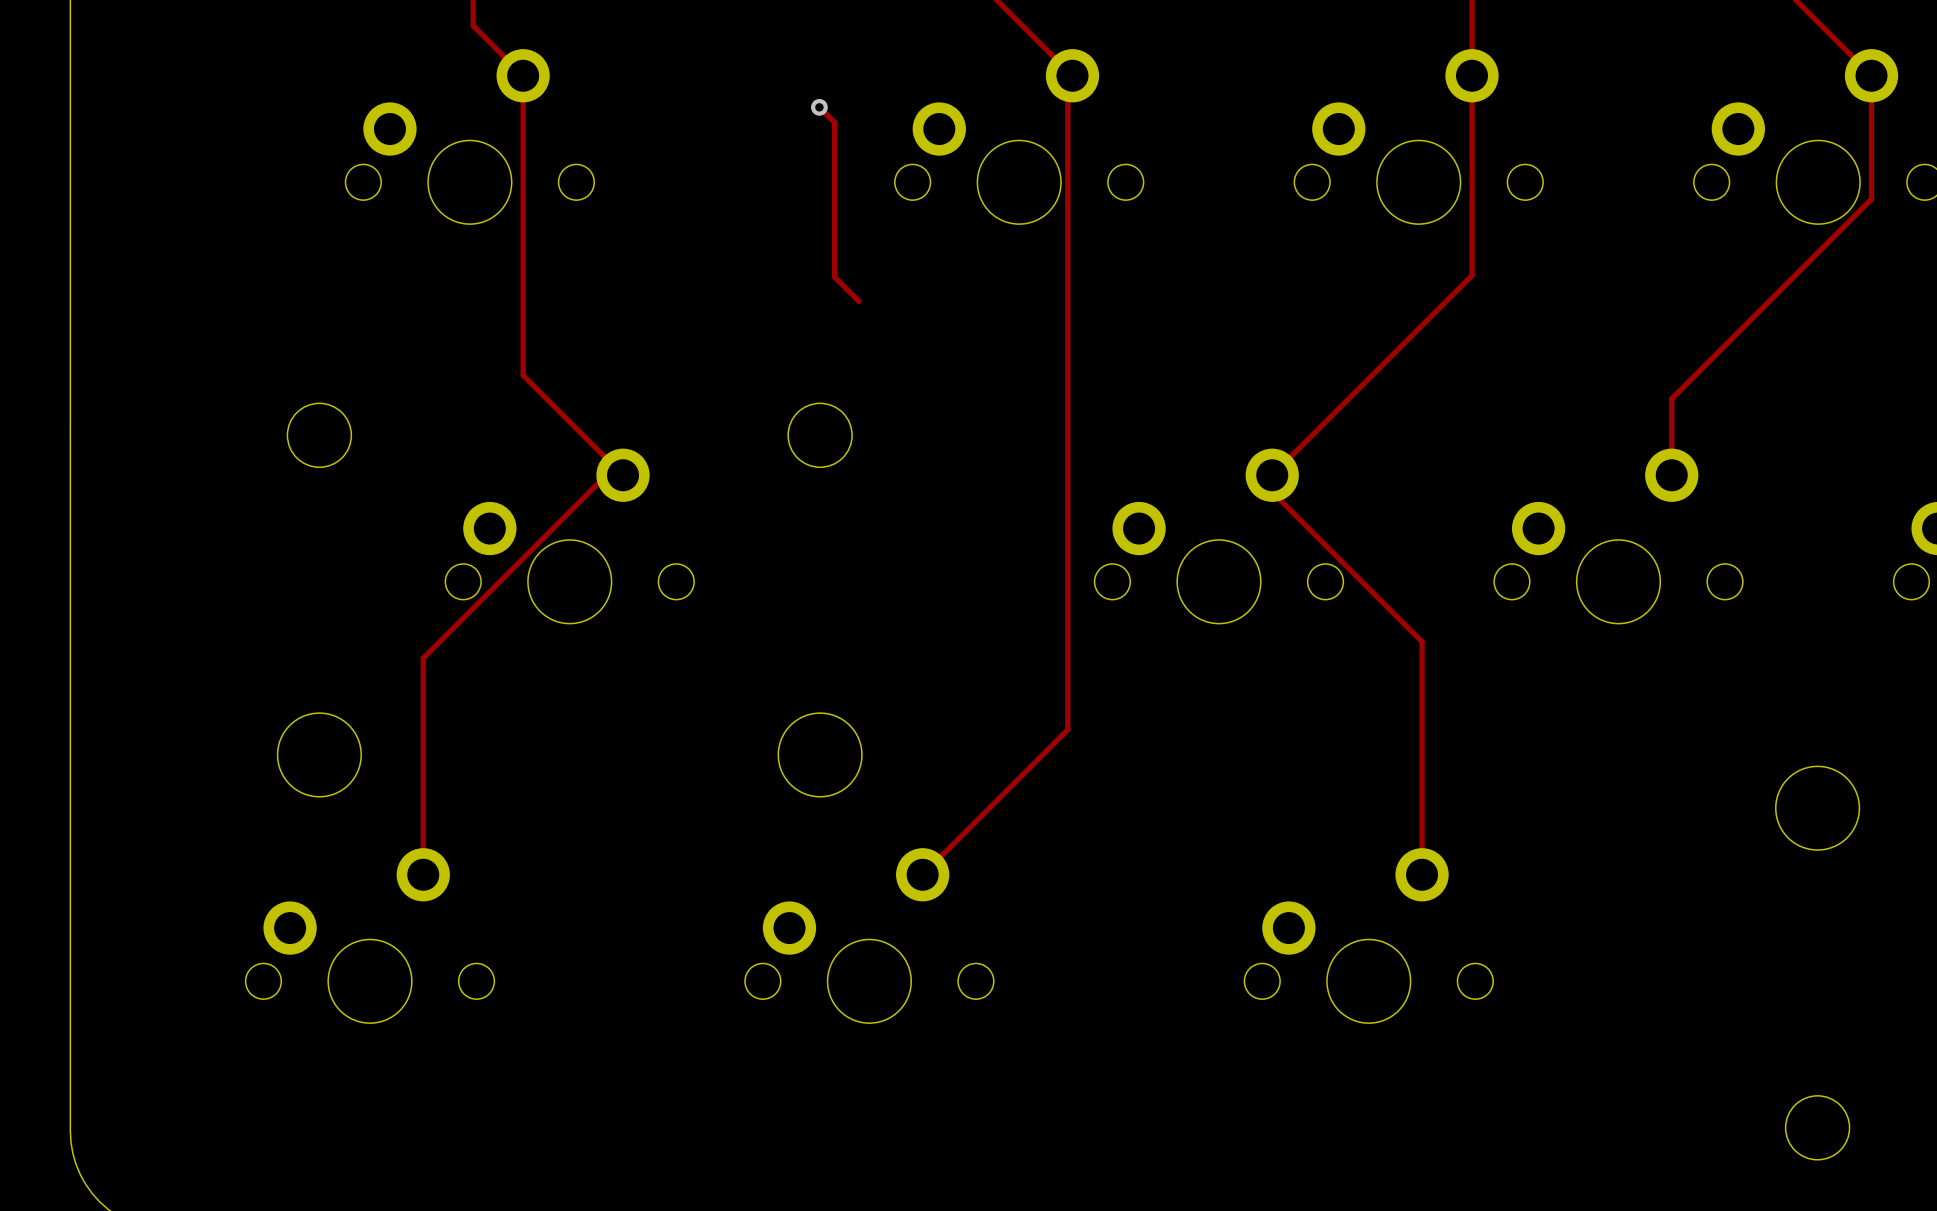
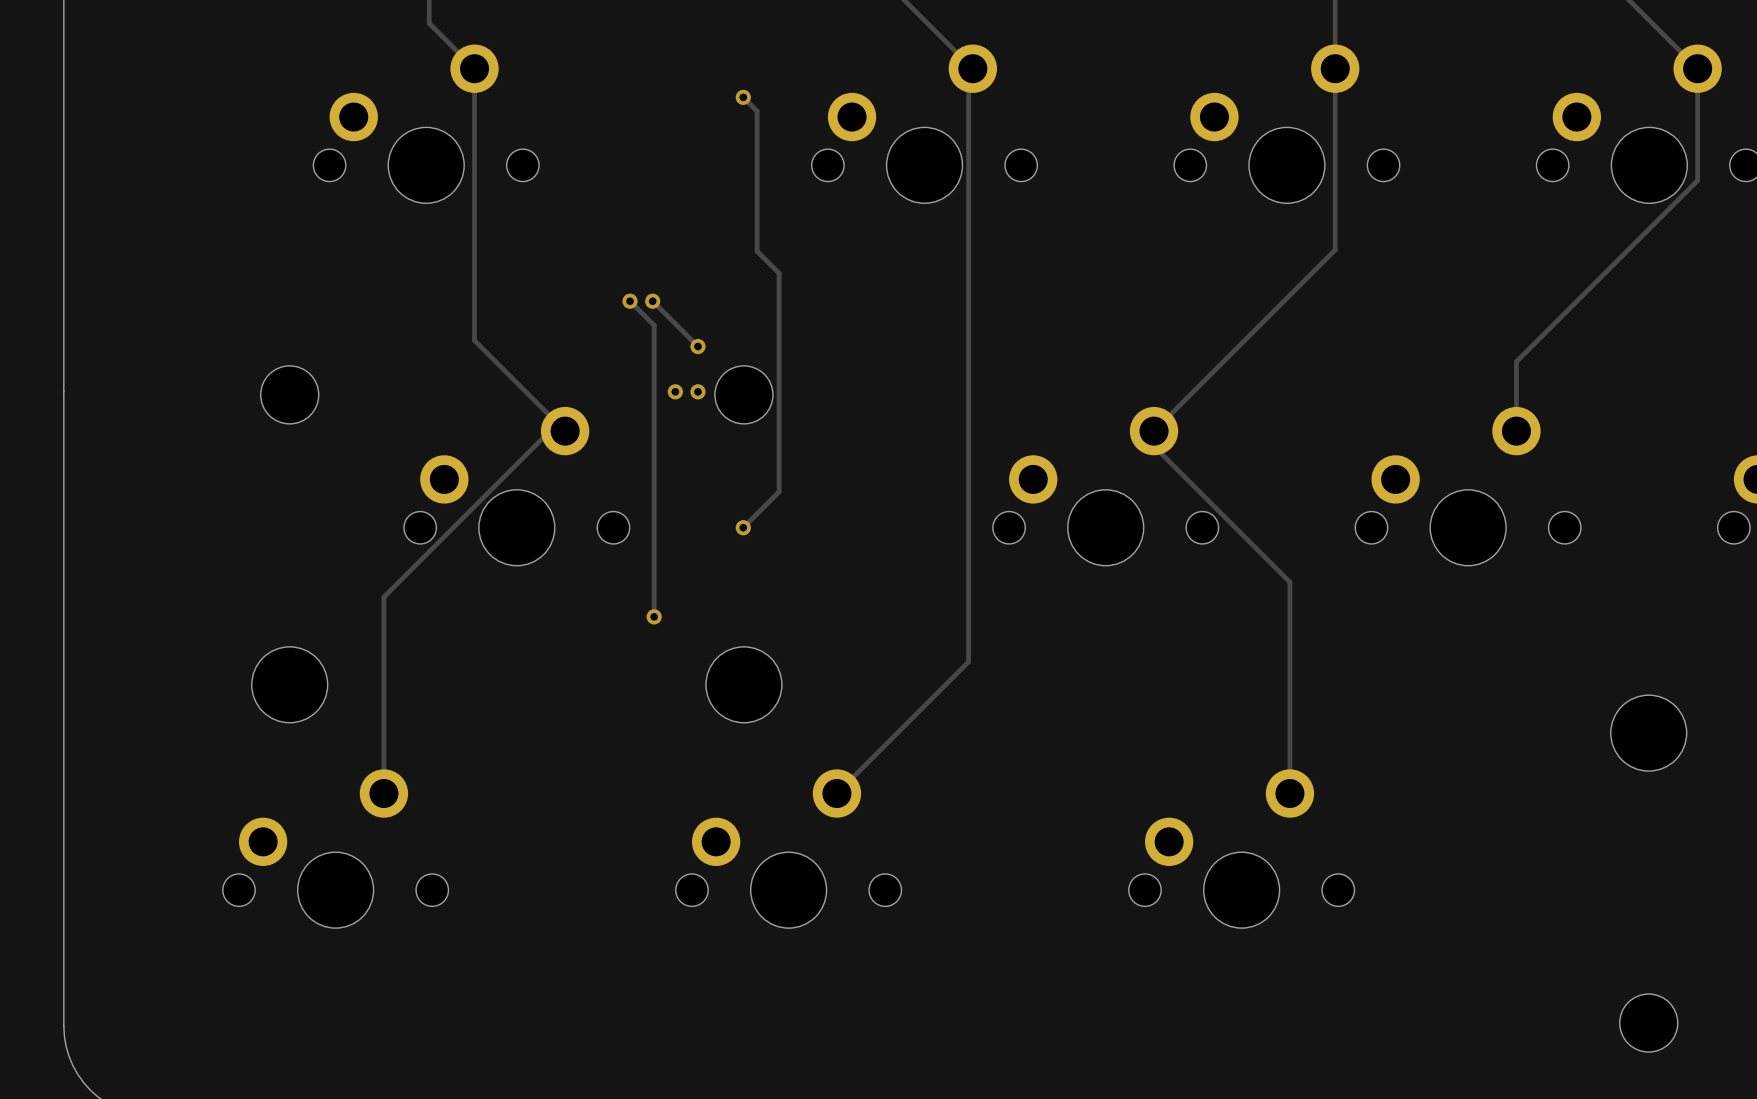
track: none -> (779, 273) (779, 491) (743, 527)
track: none -> (630, 301) (654, 325) (654, 616)
via: none -> (630, 301)
track: none -> (652, 301) (697, 346)
via: none -> (652, 301)
via: none -> (697, 346)
via: none -> (675, 391)
via: none -> (697, 391)
via: none -> (743, 527)
via: none -> (654, 616)

